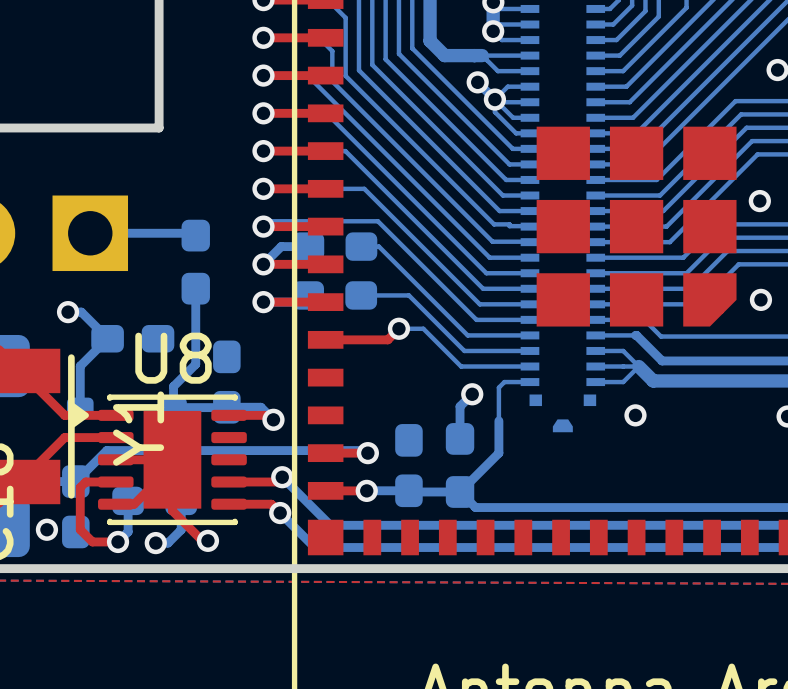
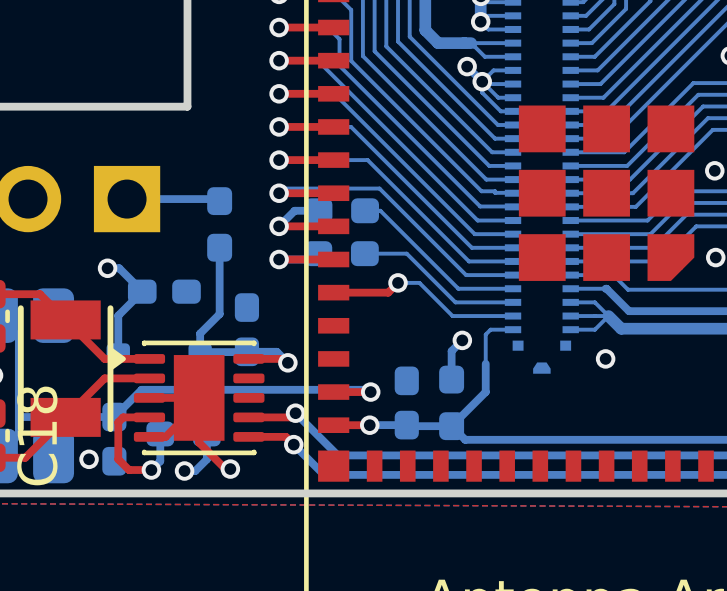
U8 name: U8 (173, 358) -> none
Y1 name: Y1 (138, 428) -> none

